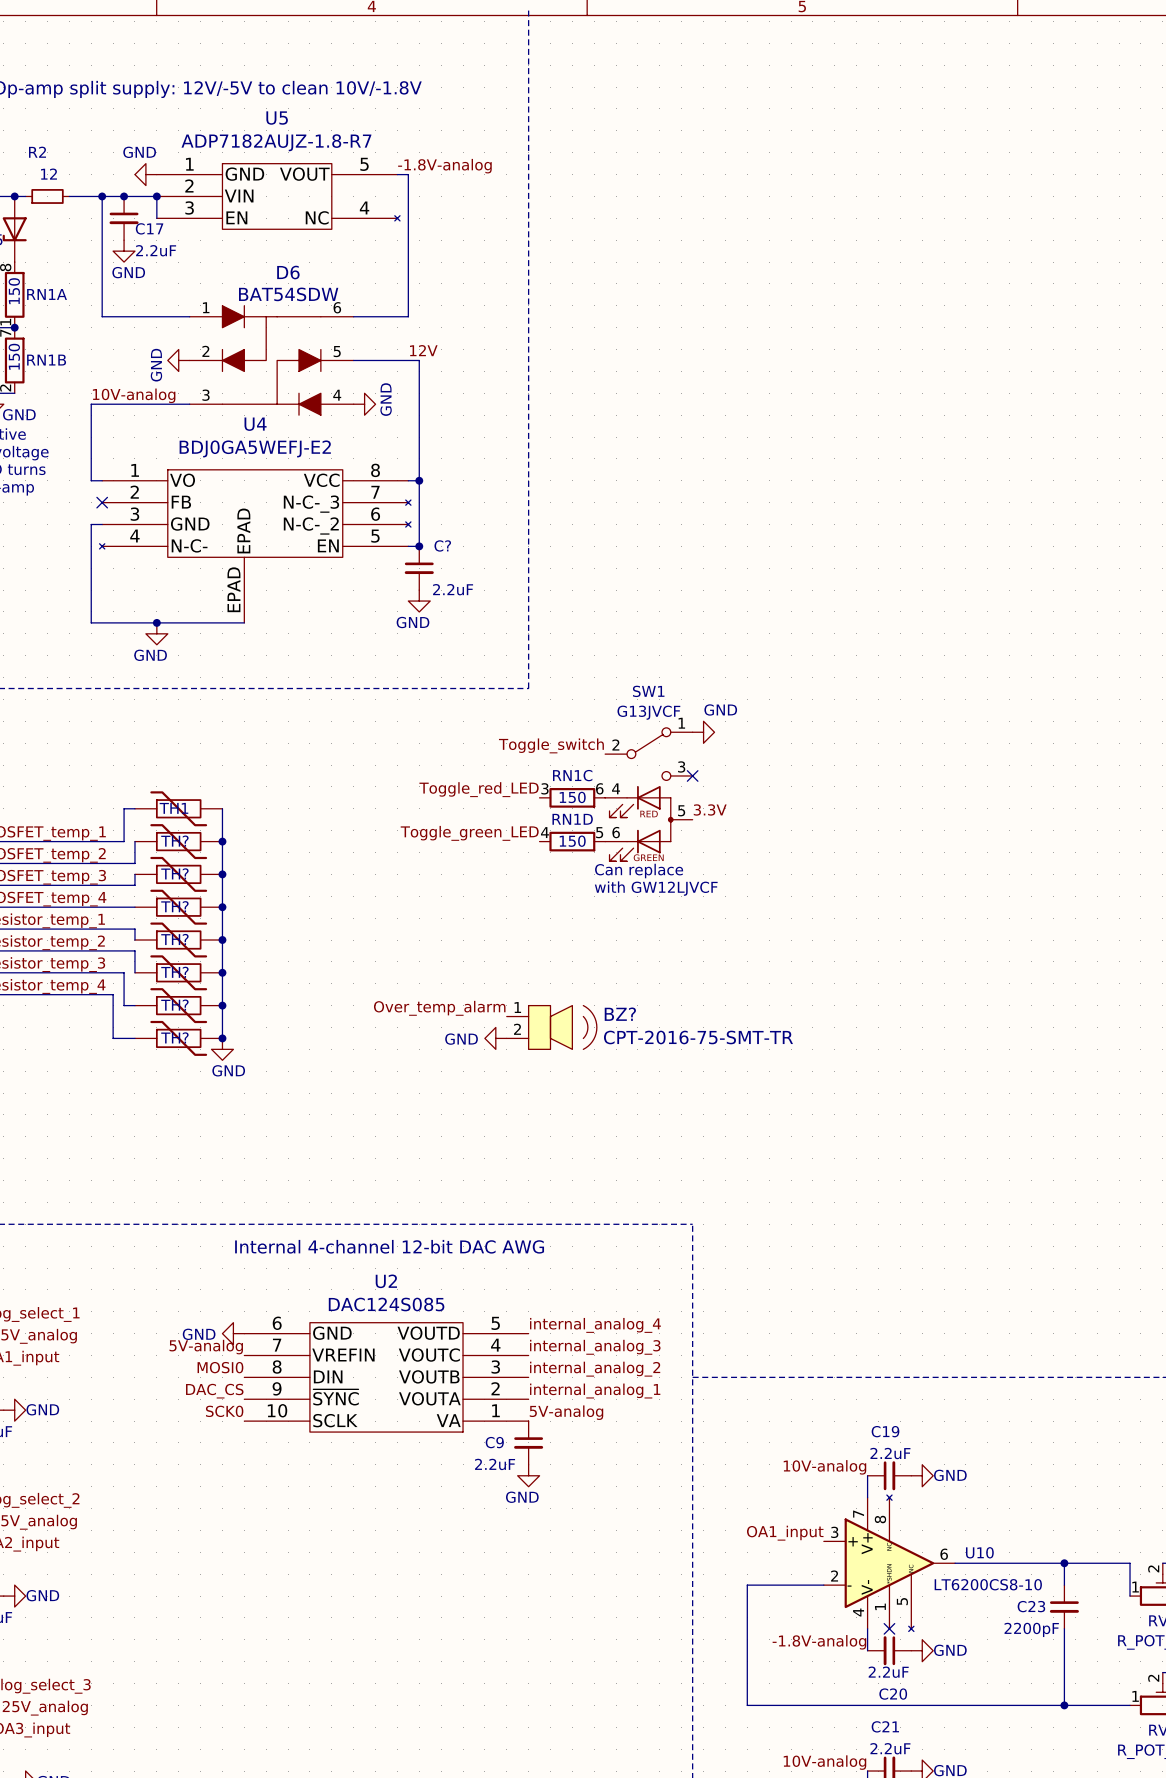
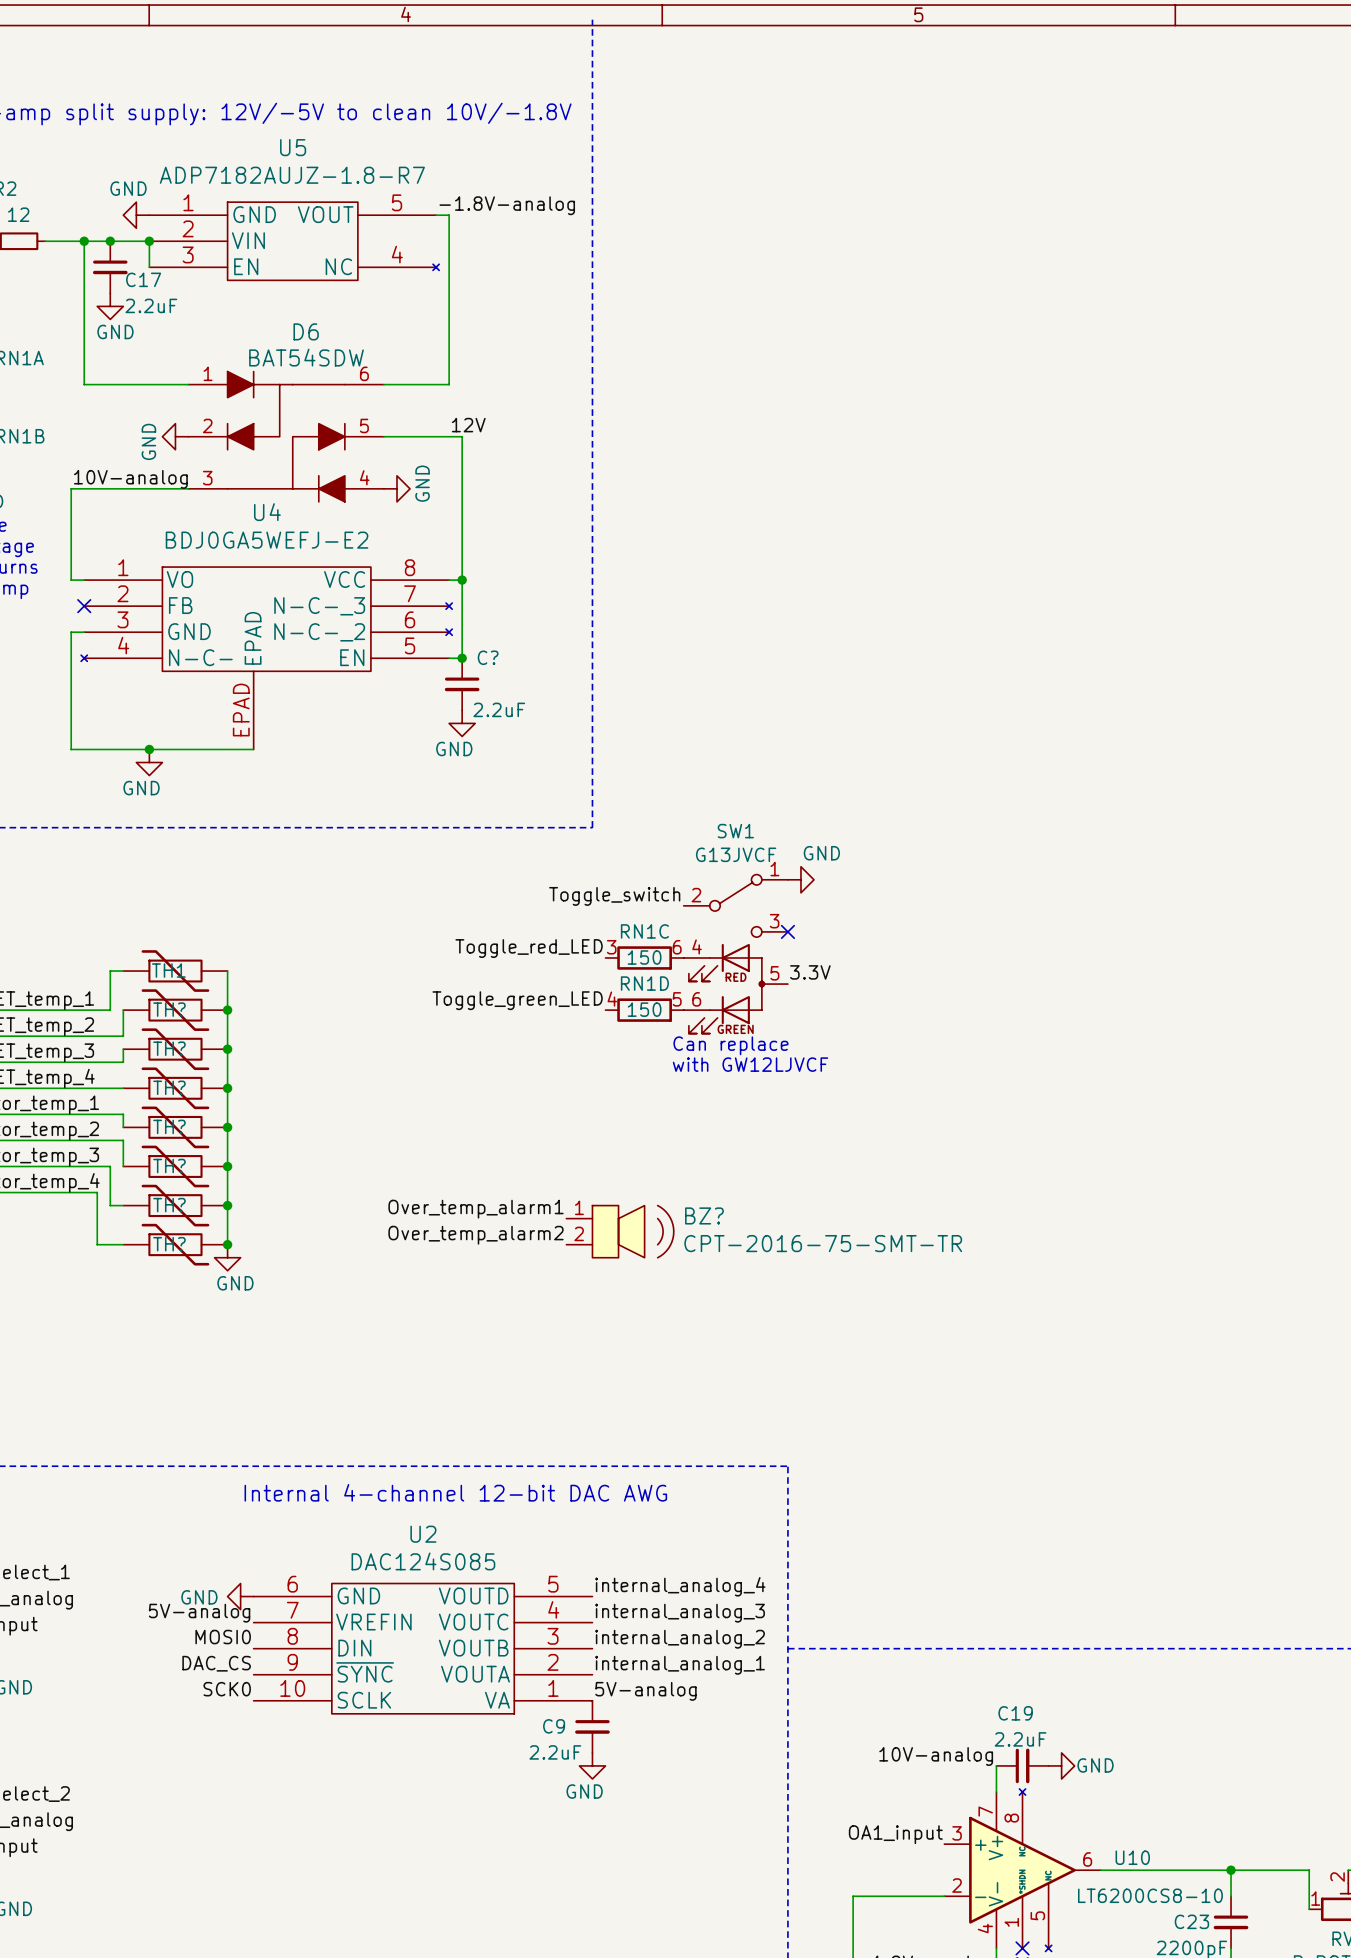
label: Over_temp_alarm (439, 1008) -> Over_temp_alarm1 (476, 1209)
label: none -> Over_temp_alarm2 (476, 1235)
power symbol: GND (495, 1038) -> none

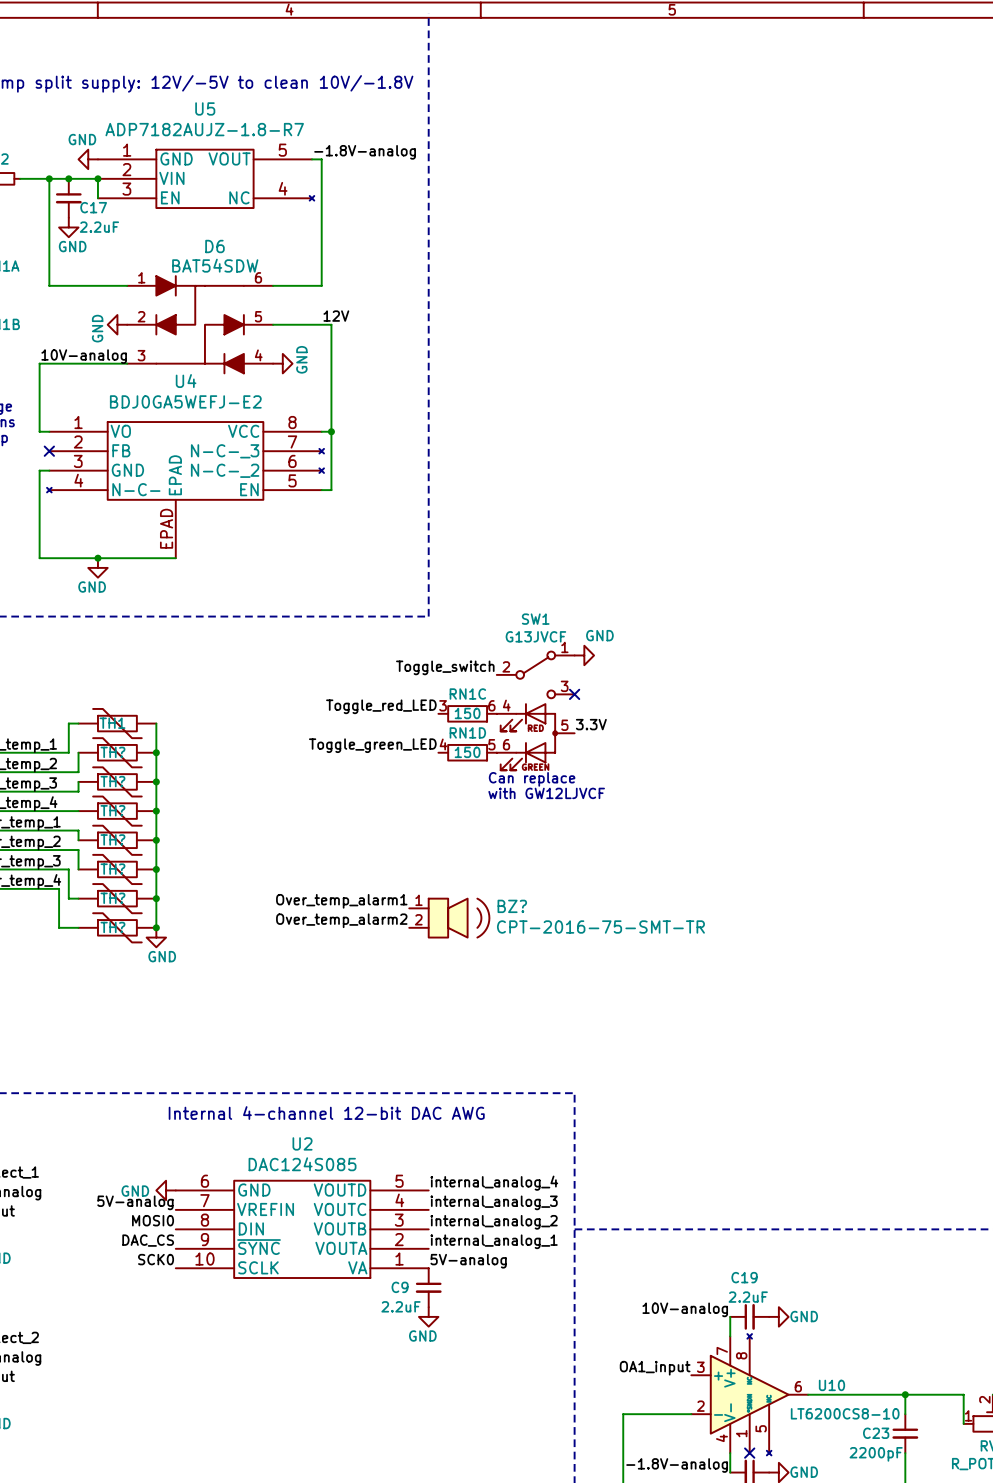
junction: (462, 658) -> none
C?: 2.2uF (462, 684) -> none
power symbol: GND (462, 723) -> none

